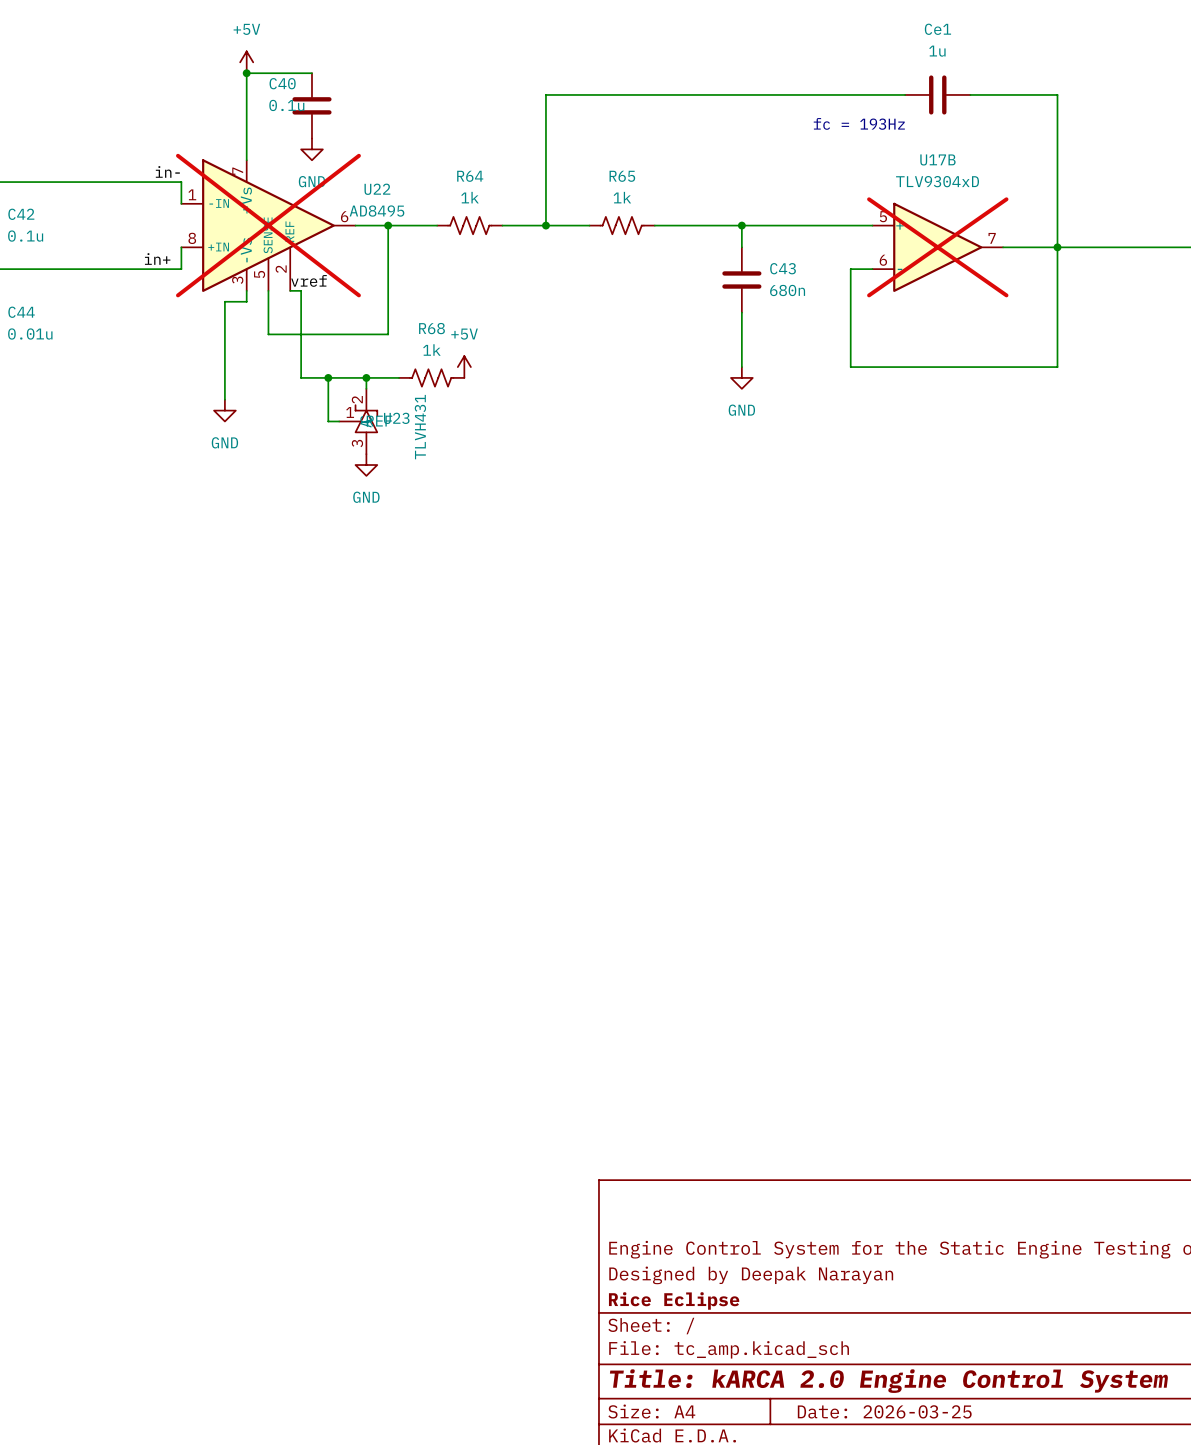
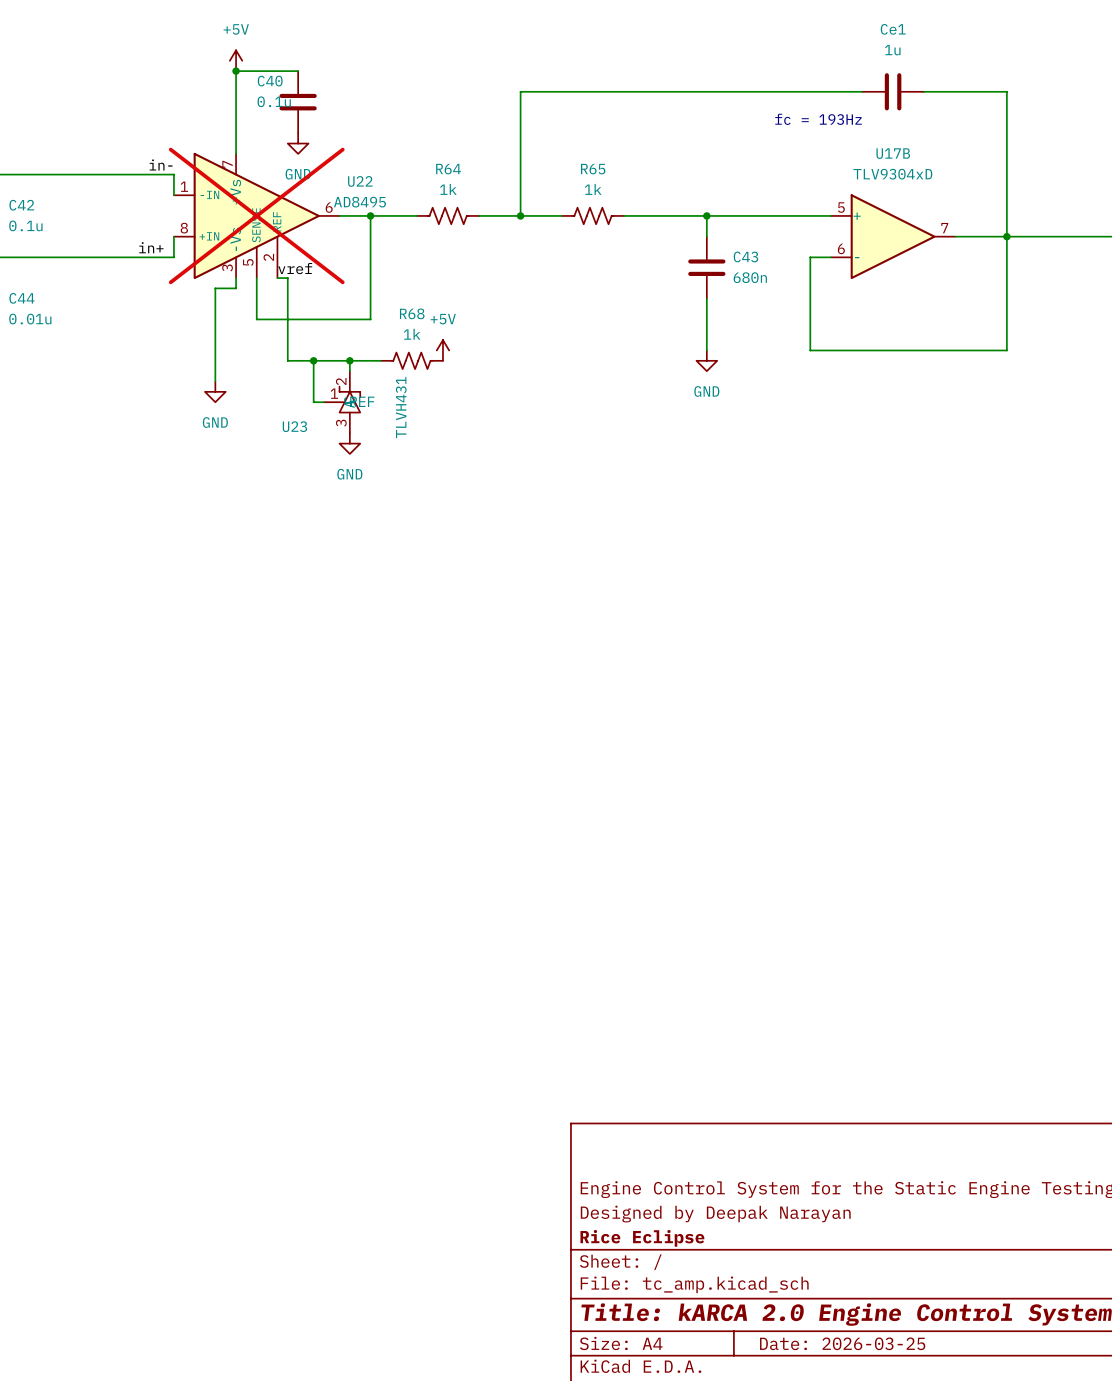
U17B do-not-place cross: (937, 247) -> none
U23 name position: U23 (396, 418) -> U23 (294, 426)

